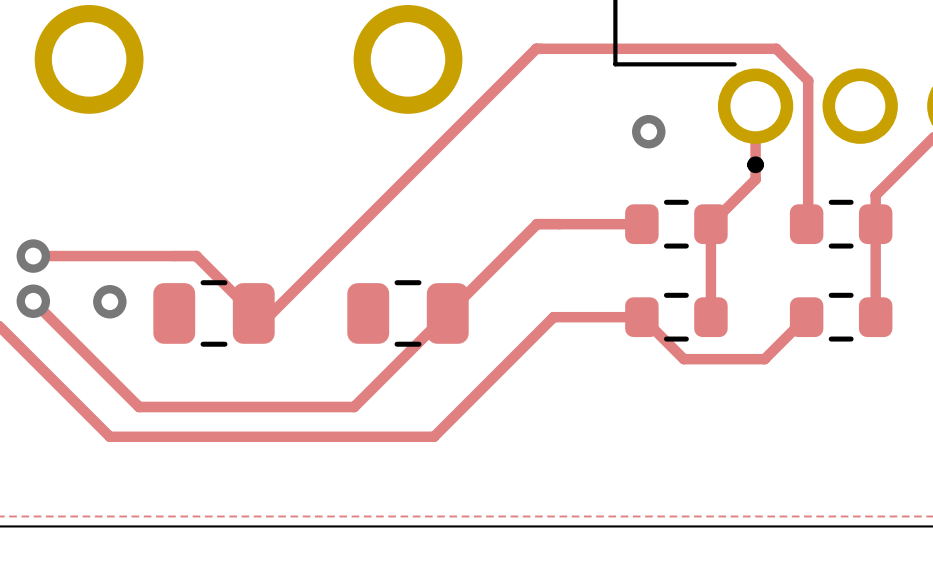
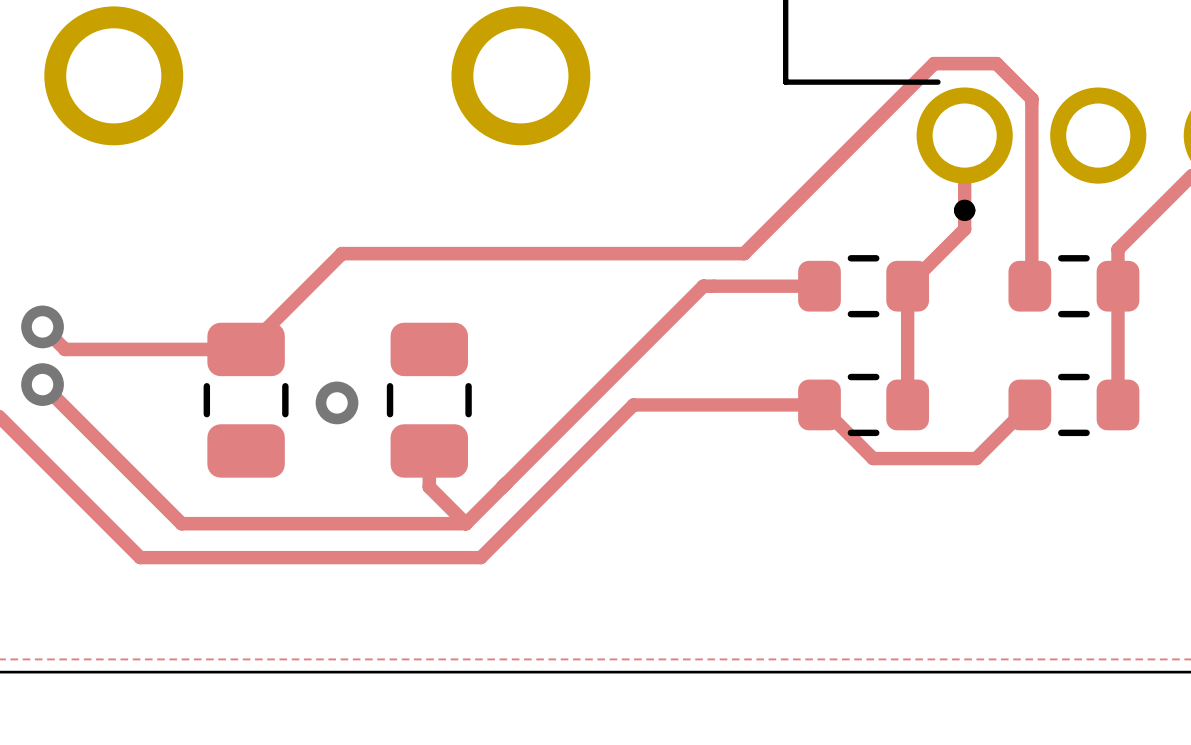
track: (808, 80) (776, 48) (536, 48) (271, 313) (253, 313) (196, 256) (33, 256) -> (1031, 103) (1031, 98) (996, 63) (934, 63) (744, 253) (341, 253) (246, 349) (65, 349) (42, 326)
via: (648, 131) -> none
track: (550, 224) (537, 224) (354, 407) (139, 407) -> (703, 286) (465, 523)
via position: (109, 301) -> (337, 402)
part rotation: 0° (214, 313) -> 90° clockwise (246, 400)
part rotation: 0° (408, 313) -> 90° clockwise (429, 400)
track: (553, 317) (434, 436) (376, 436) -> (706, 404) (633, 404) (480, 557)
track: none -> (429, 450) (429, 487) (465, 523)
track: none -> (177, 519) (181, 523) (465, 523)

